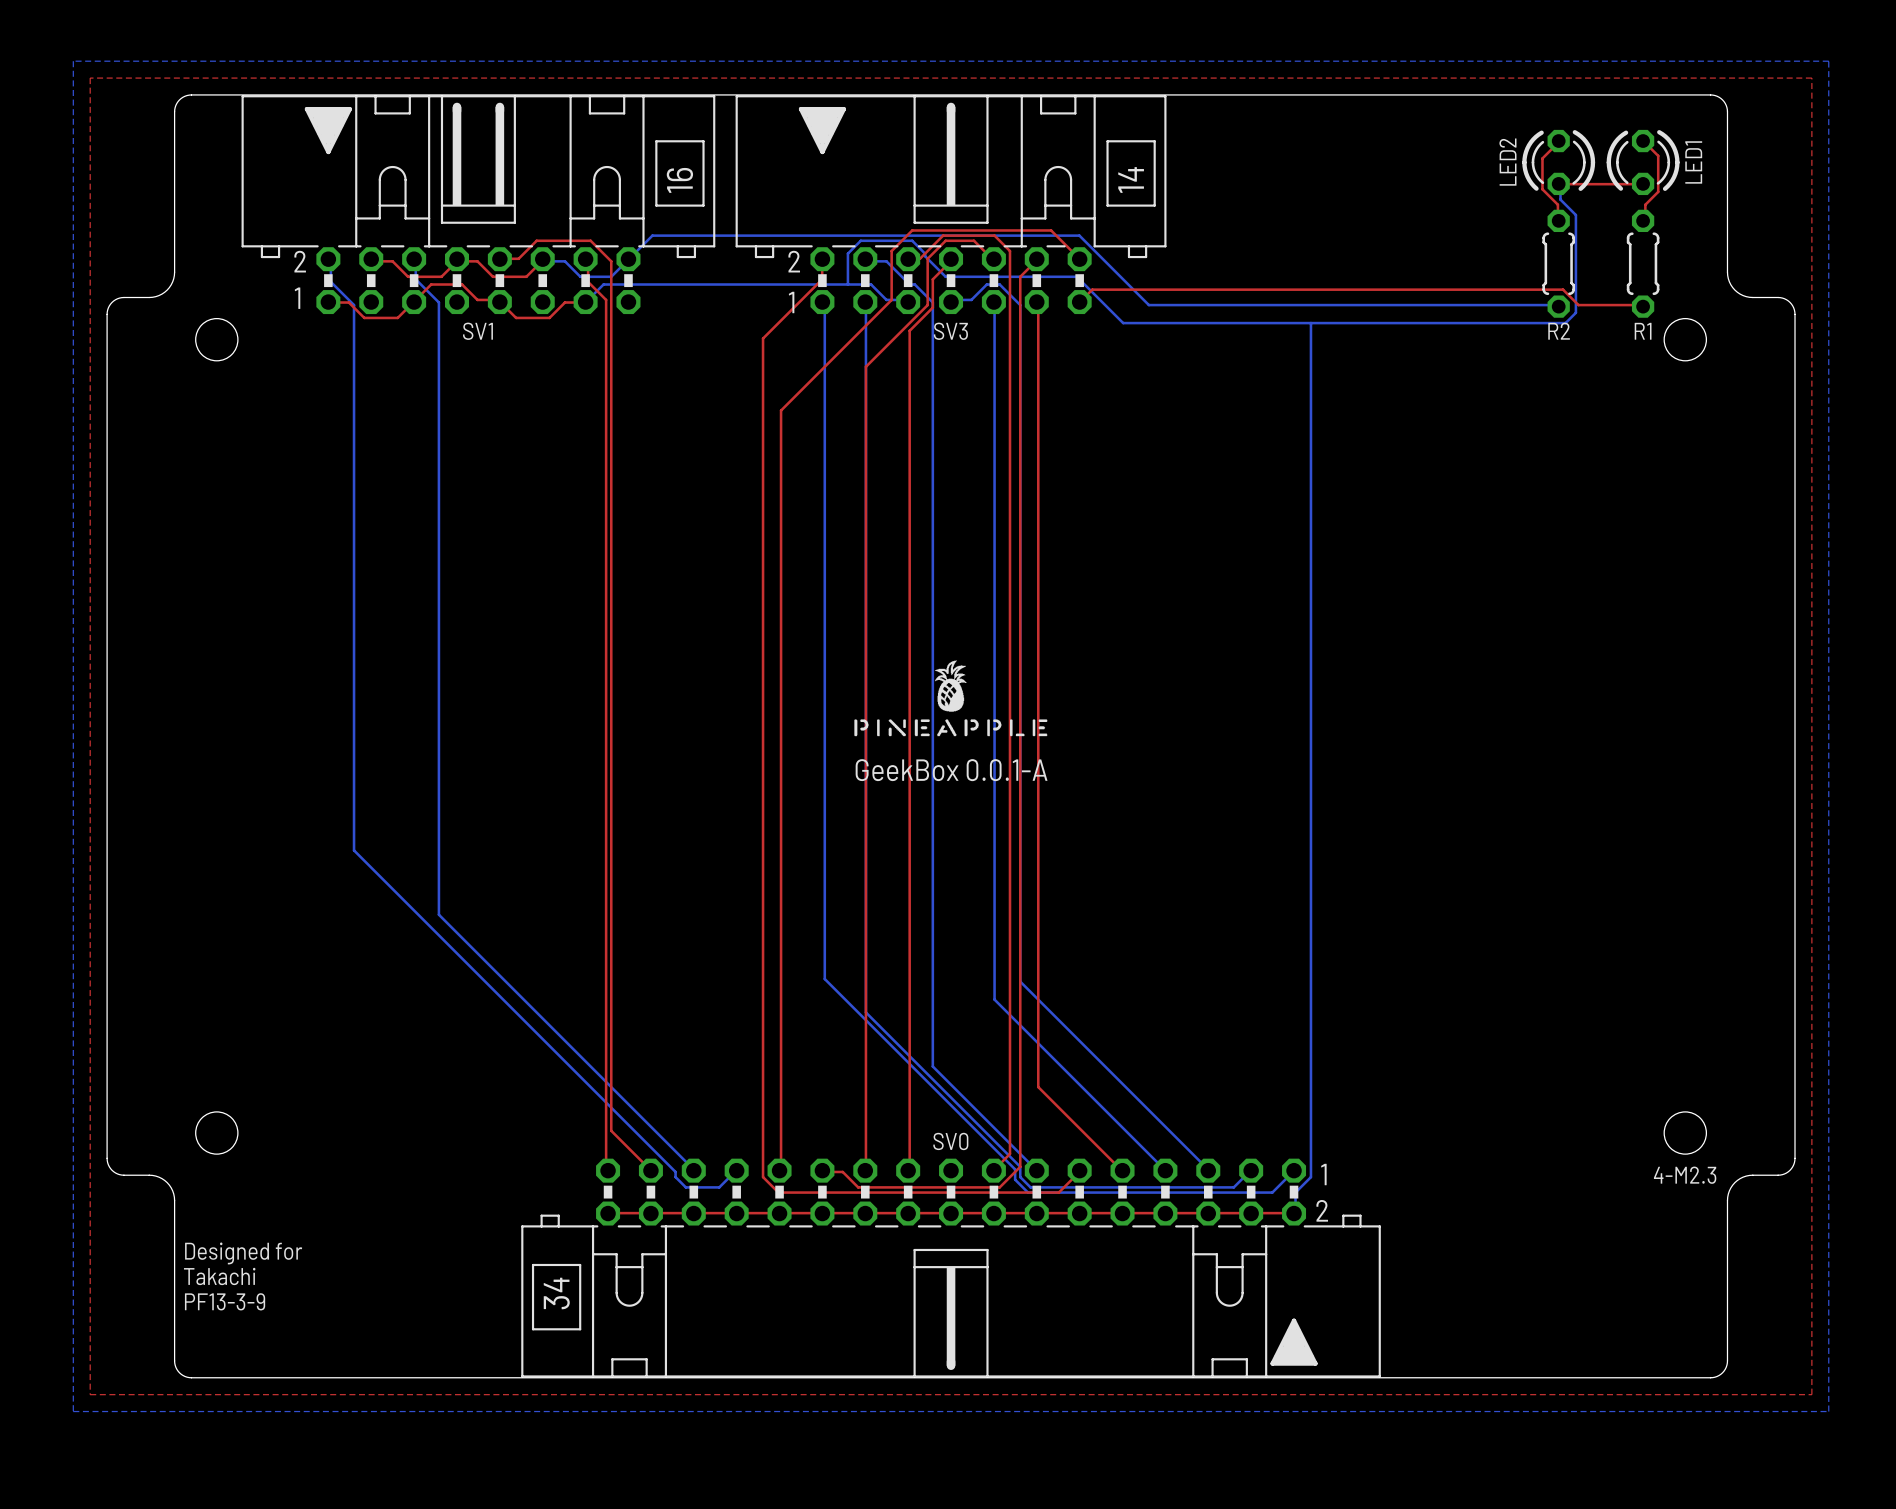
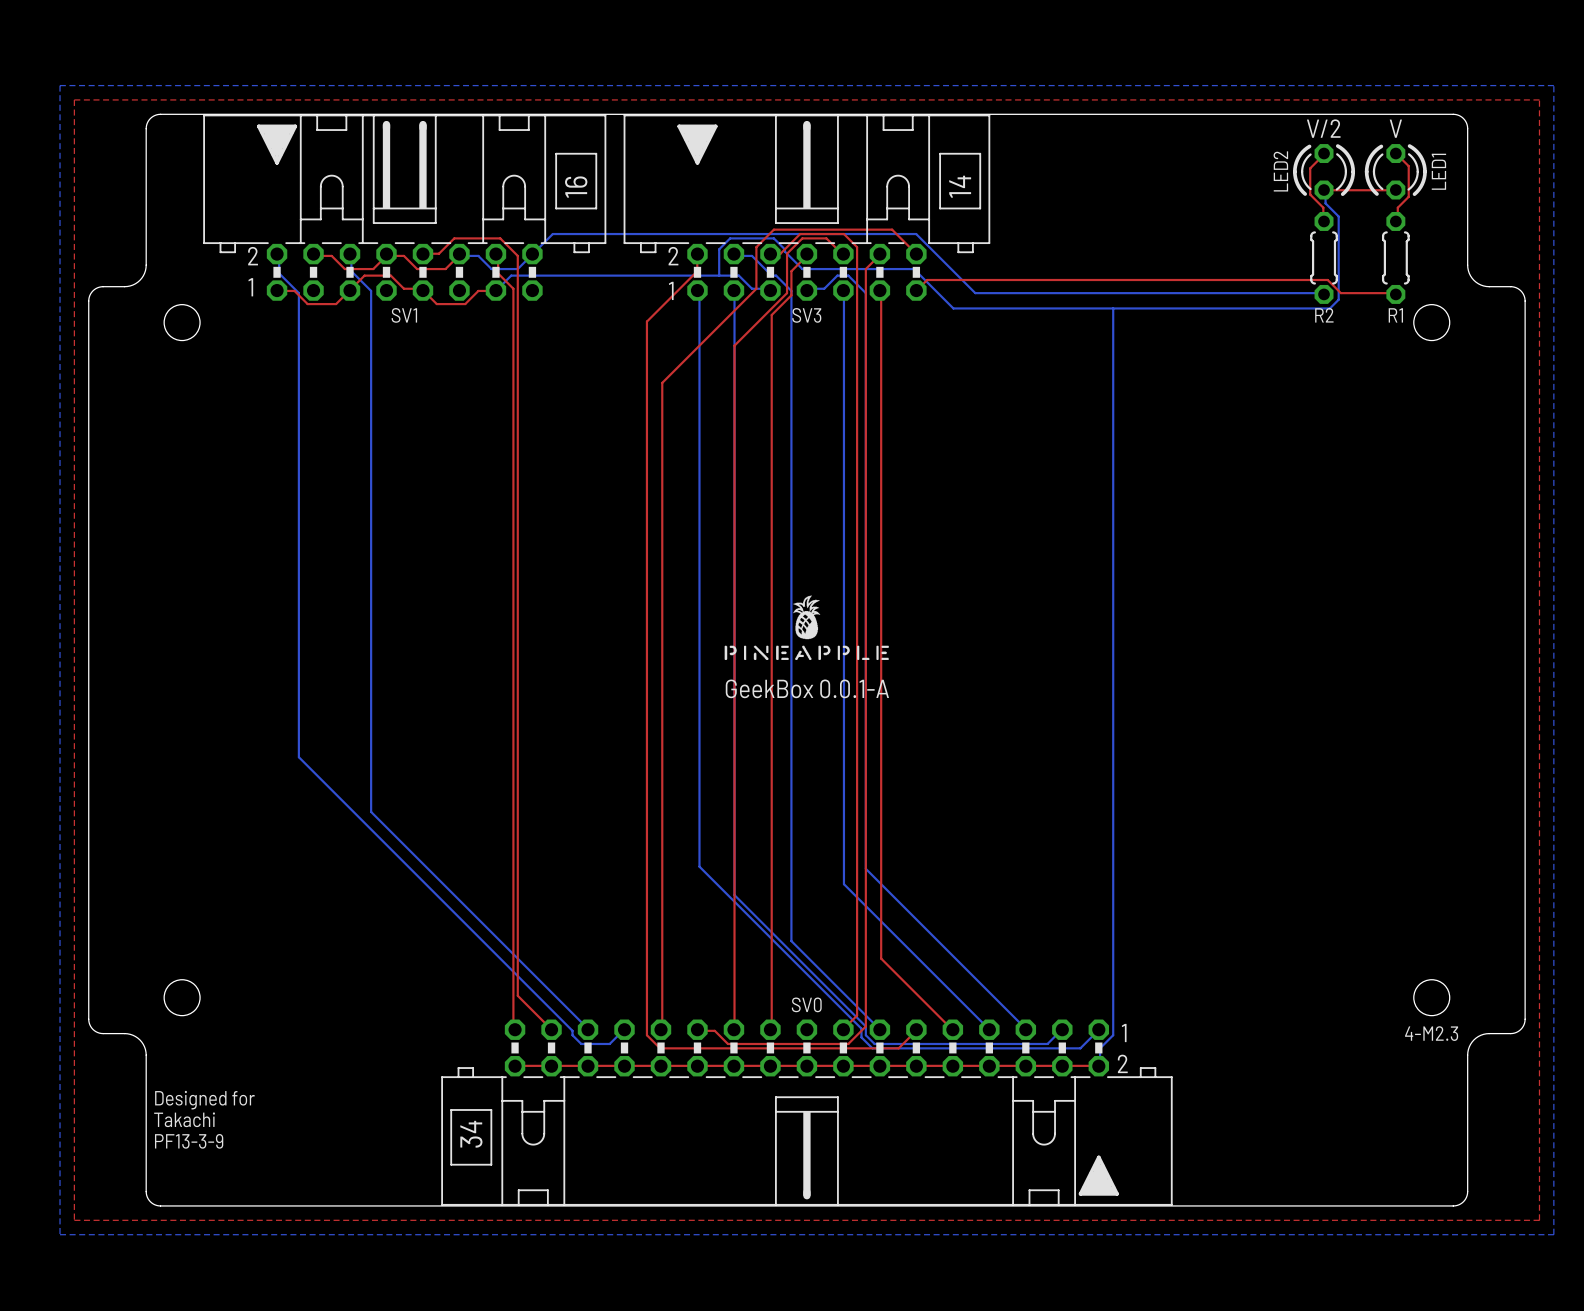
text: none -> V/2 (1323, 128)
text: none -> V (1395, 128)

